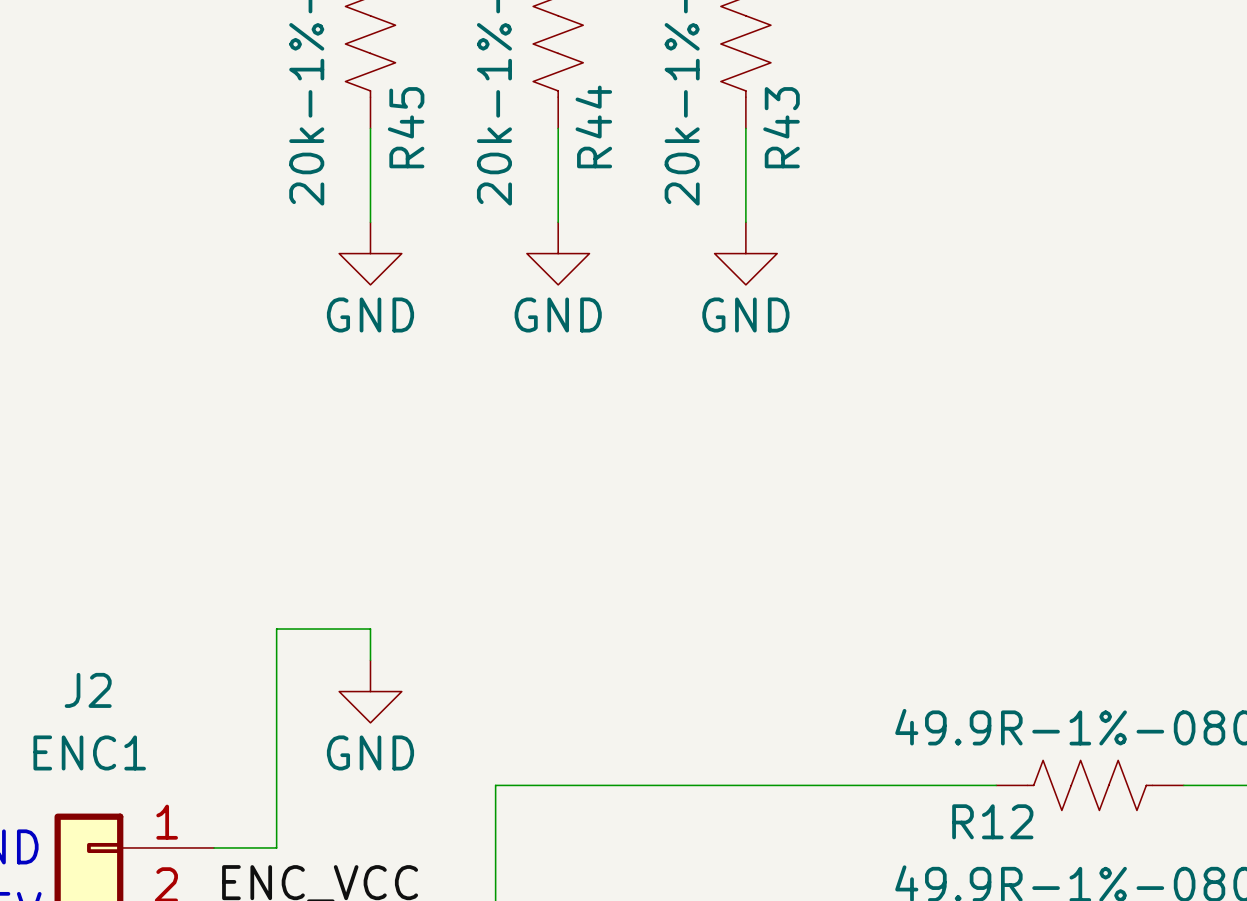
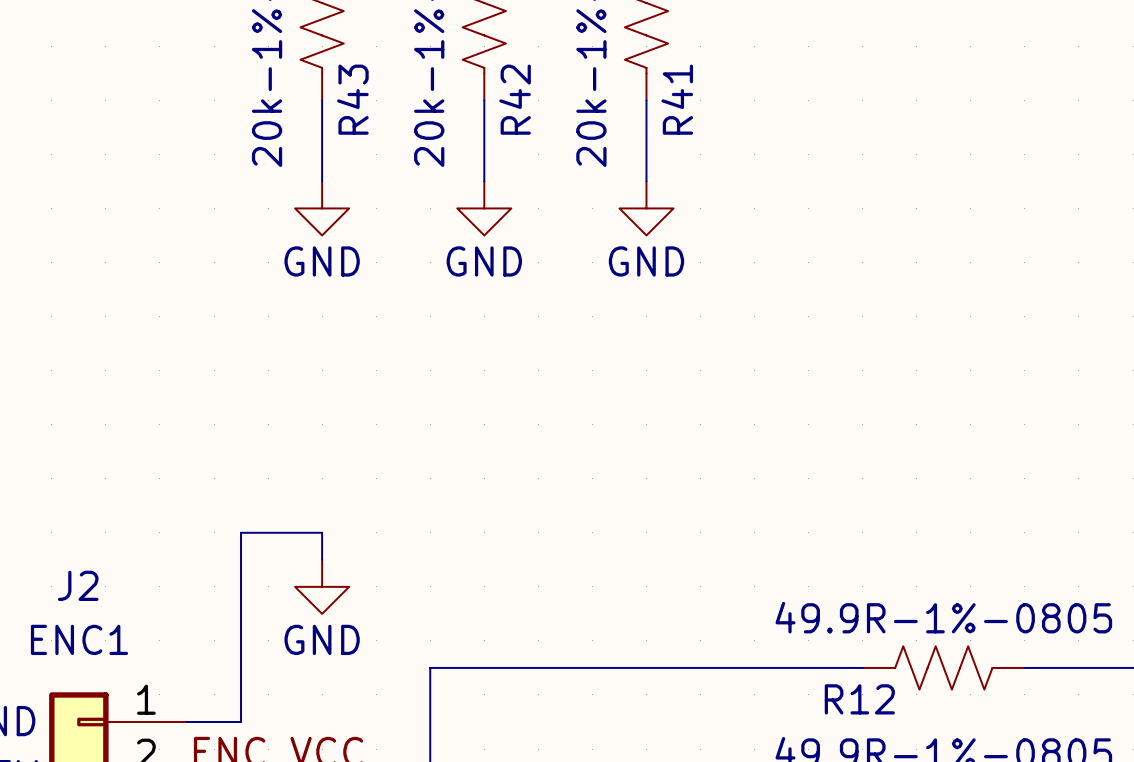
R44 name: R44 (593, 126) -> R42 (515, 99)
R45 name: R45 (406, 127) -> R43 (352, 99)
R43 name: R43 (781, 127) -> R41 (677, 99)

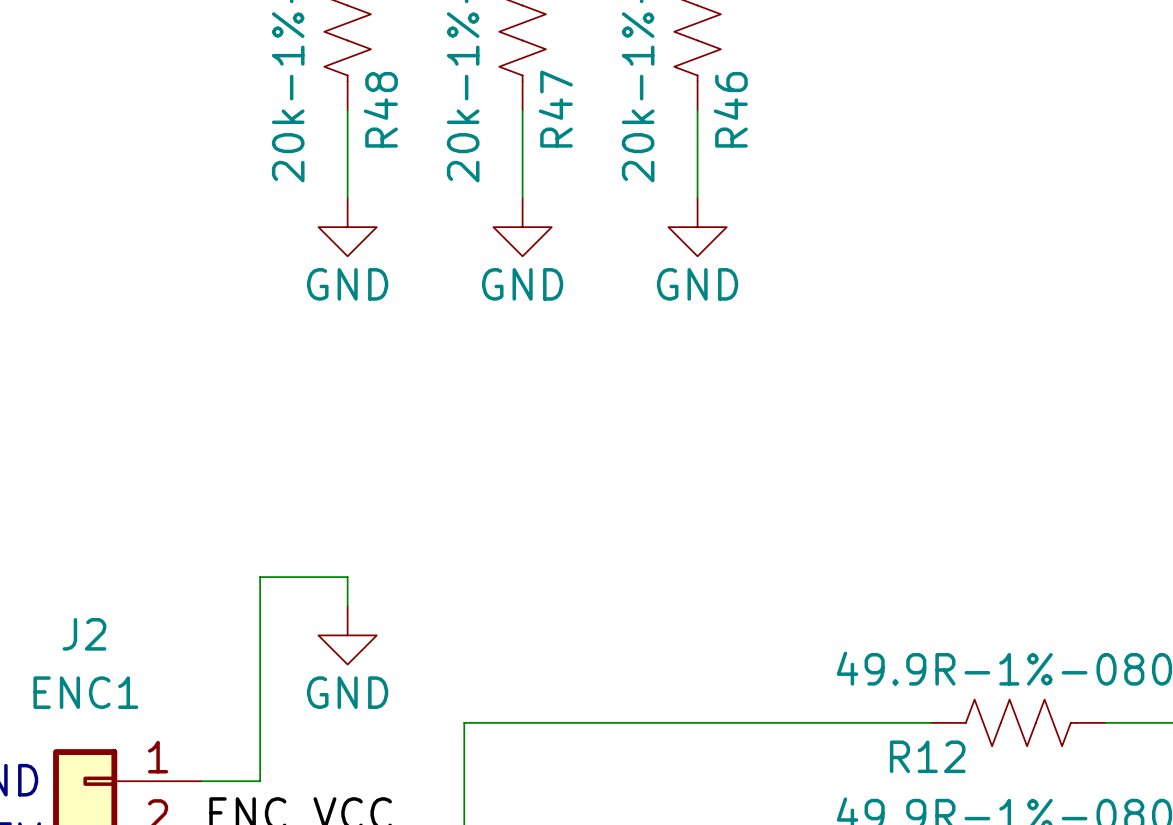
R43 name: R43 (352, 99) -> R48 (380, 109)
R42 name: R42 (515, 99) -> R47 (555, 109)
R41 name: R41 (677, 99) -> R46 (730, 109)

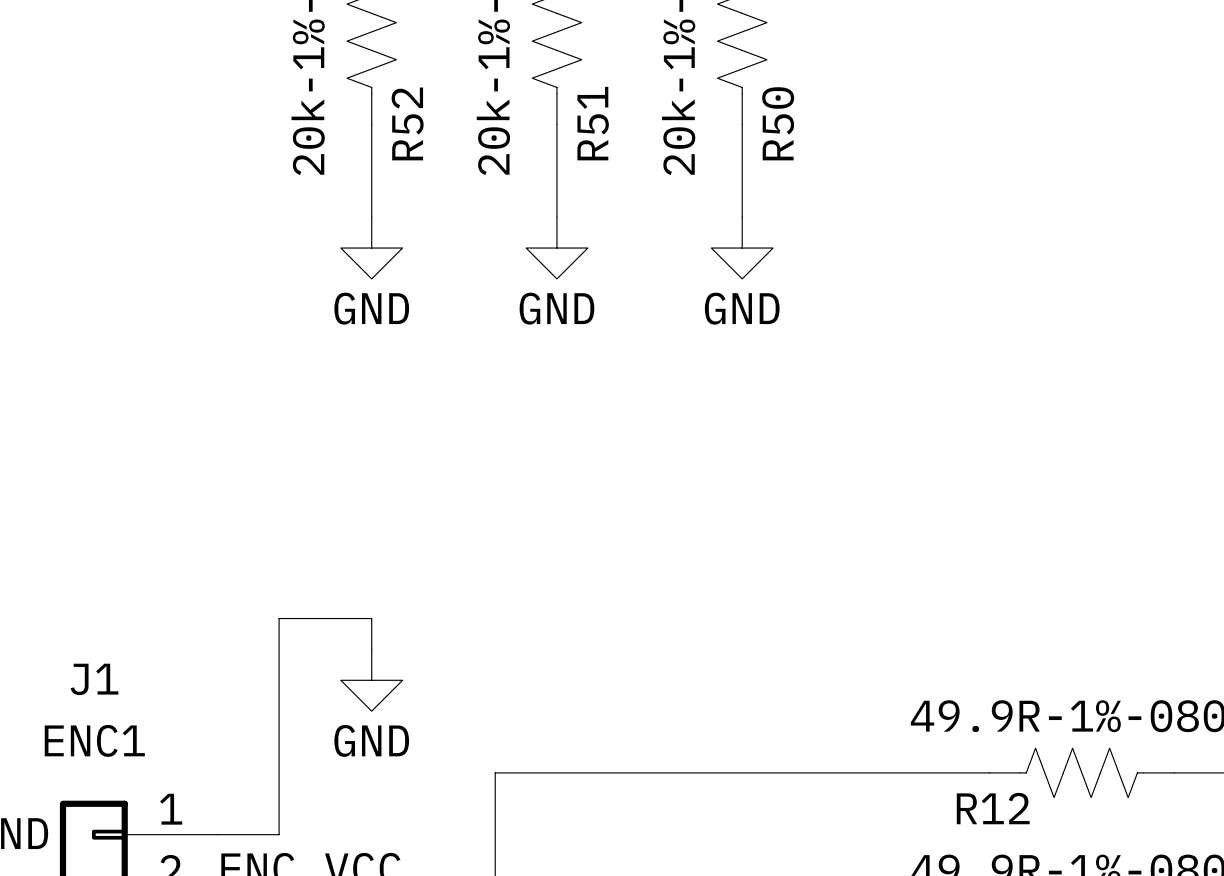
R48 name: R48 (380, 109) -> R52 (407, 123)
R47 name: R47 (555, 109) -> R51 (593, 123)
R46 name: R46 (730, 109) -> R50 (778, 123)
J2 name: J2 (84, 634) -> J1 (94, 679)

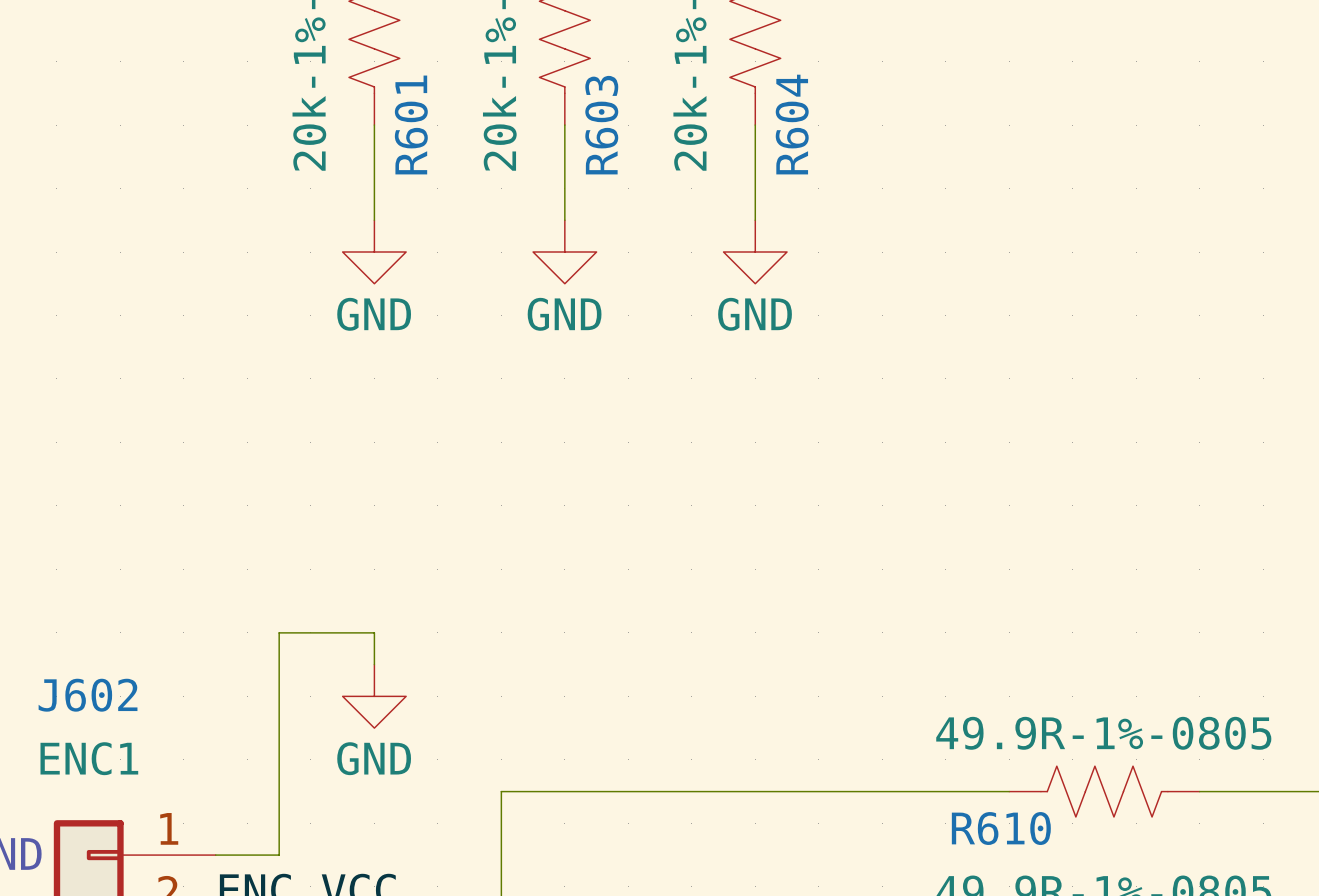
R52 name: R52 (407, 123) -> R601 (411, 124)
R51 name: R51 (593, 123) -> R603 (601, 125)
R50 name: R50 (778, 123) -> R604 (792, 124)
J1 name: J1 (94, 679) -> J602 (88, 695)
R12 name: R12 (993, 808) -> R610 (1001, 828)

